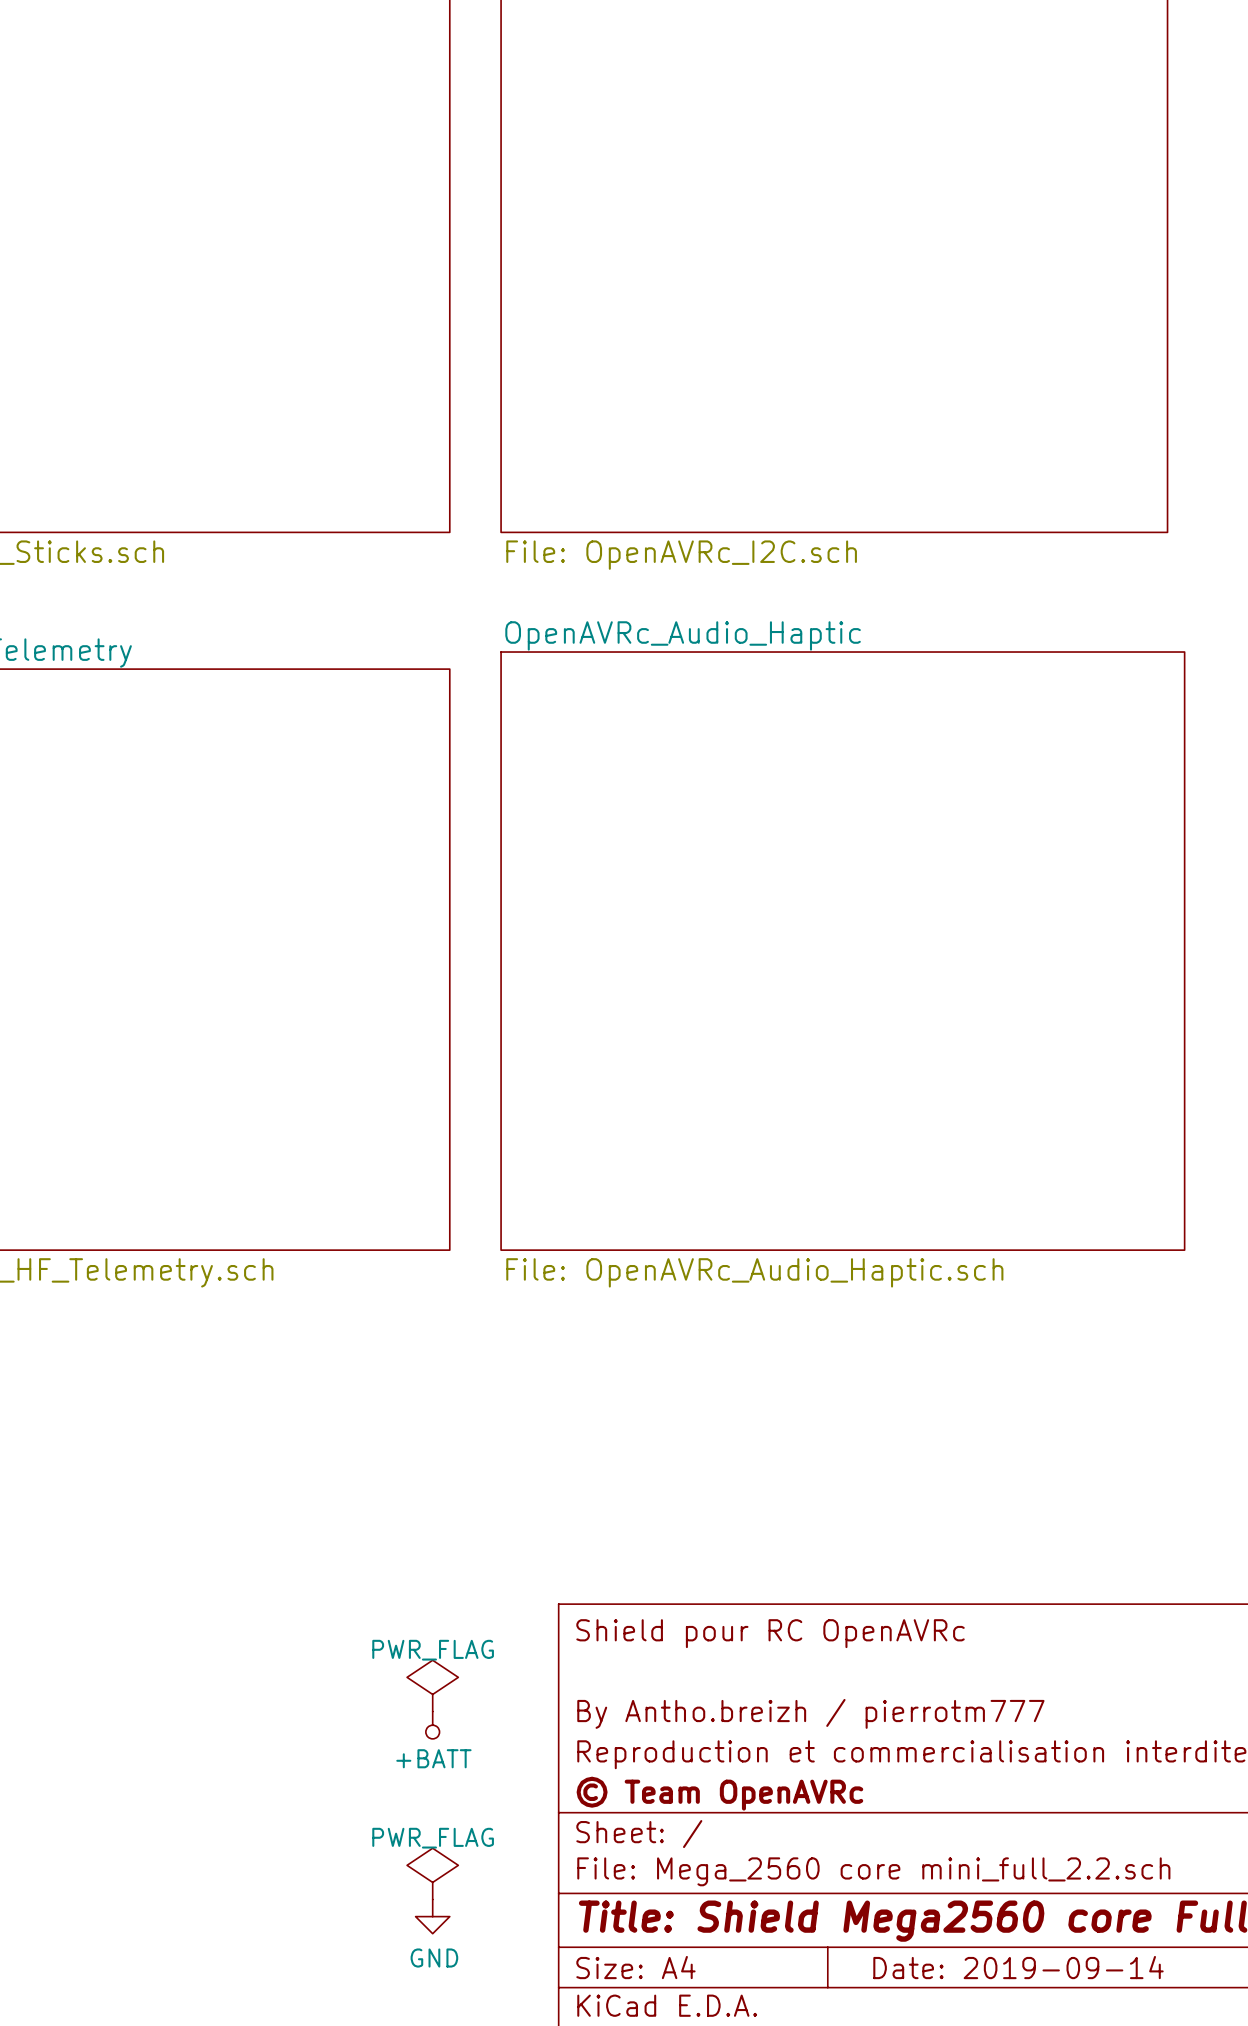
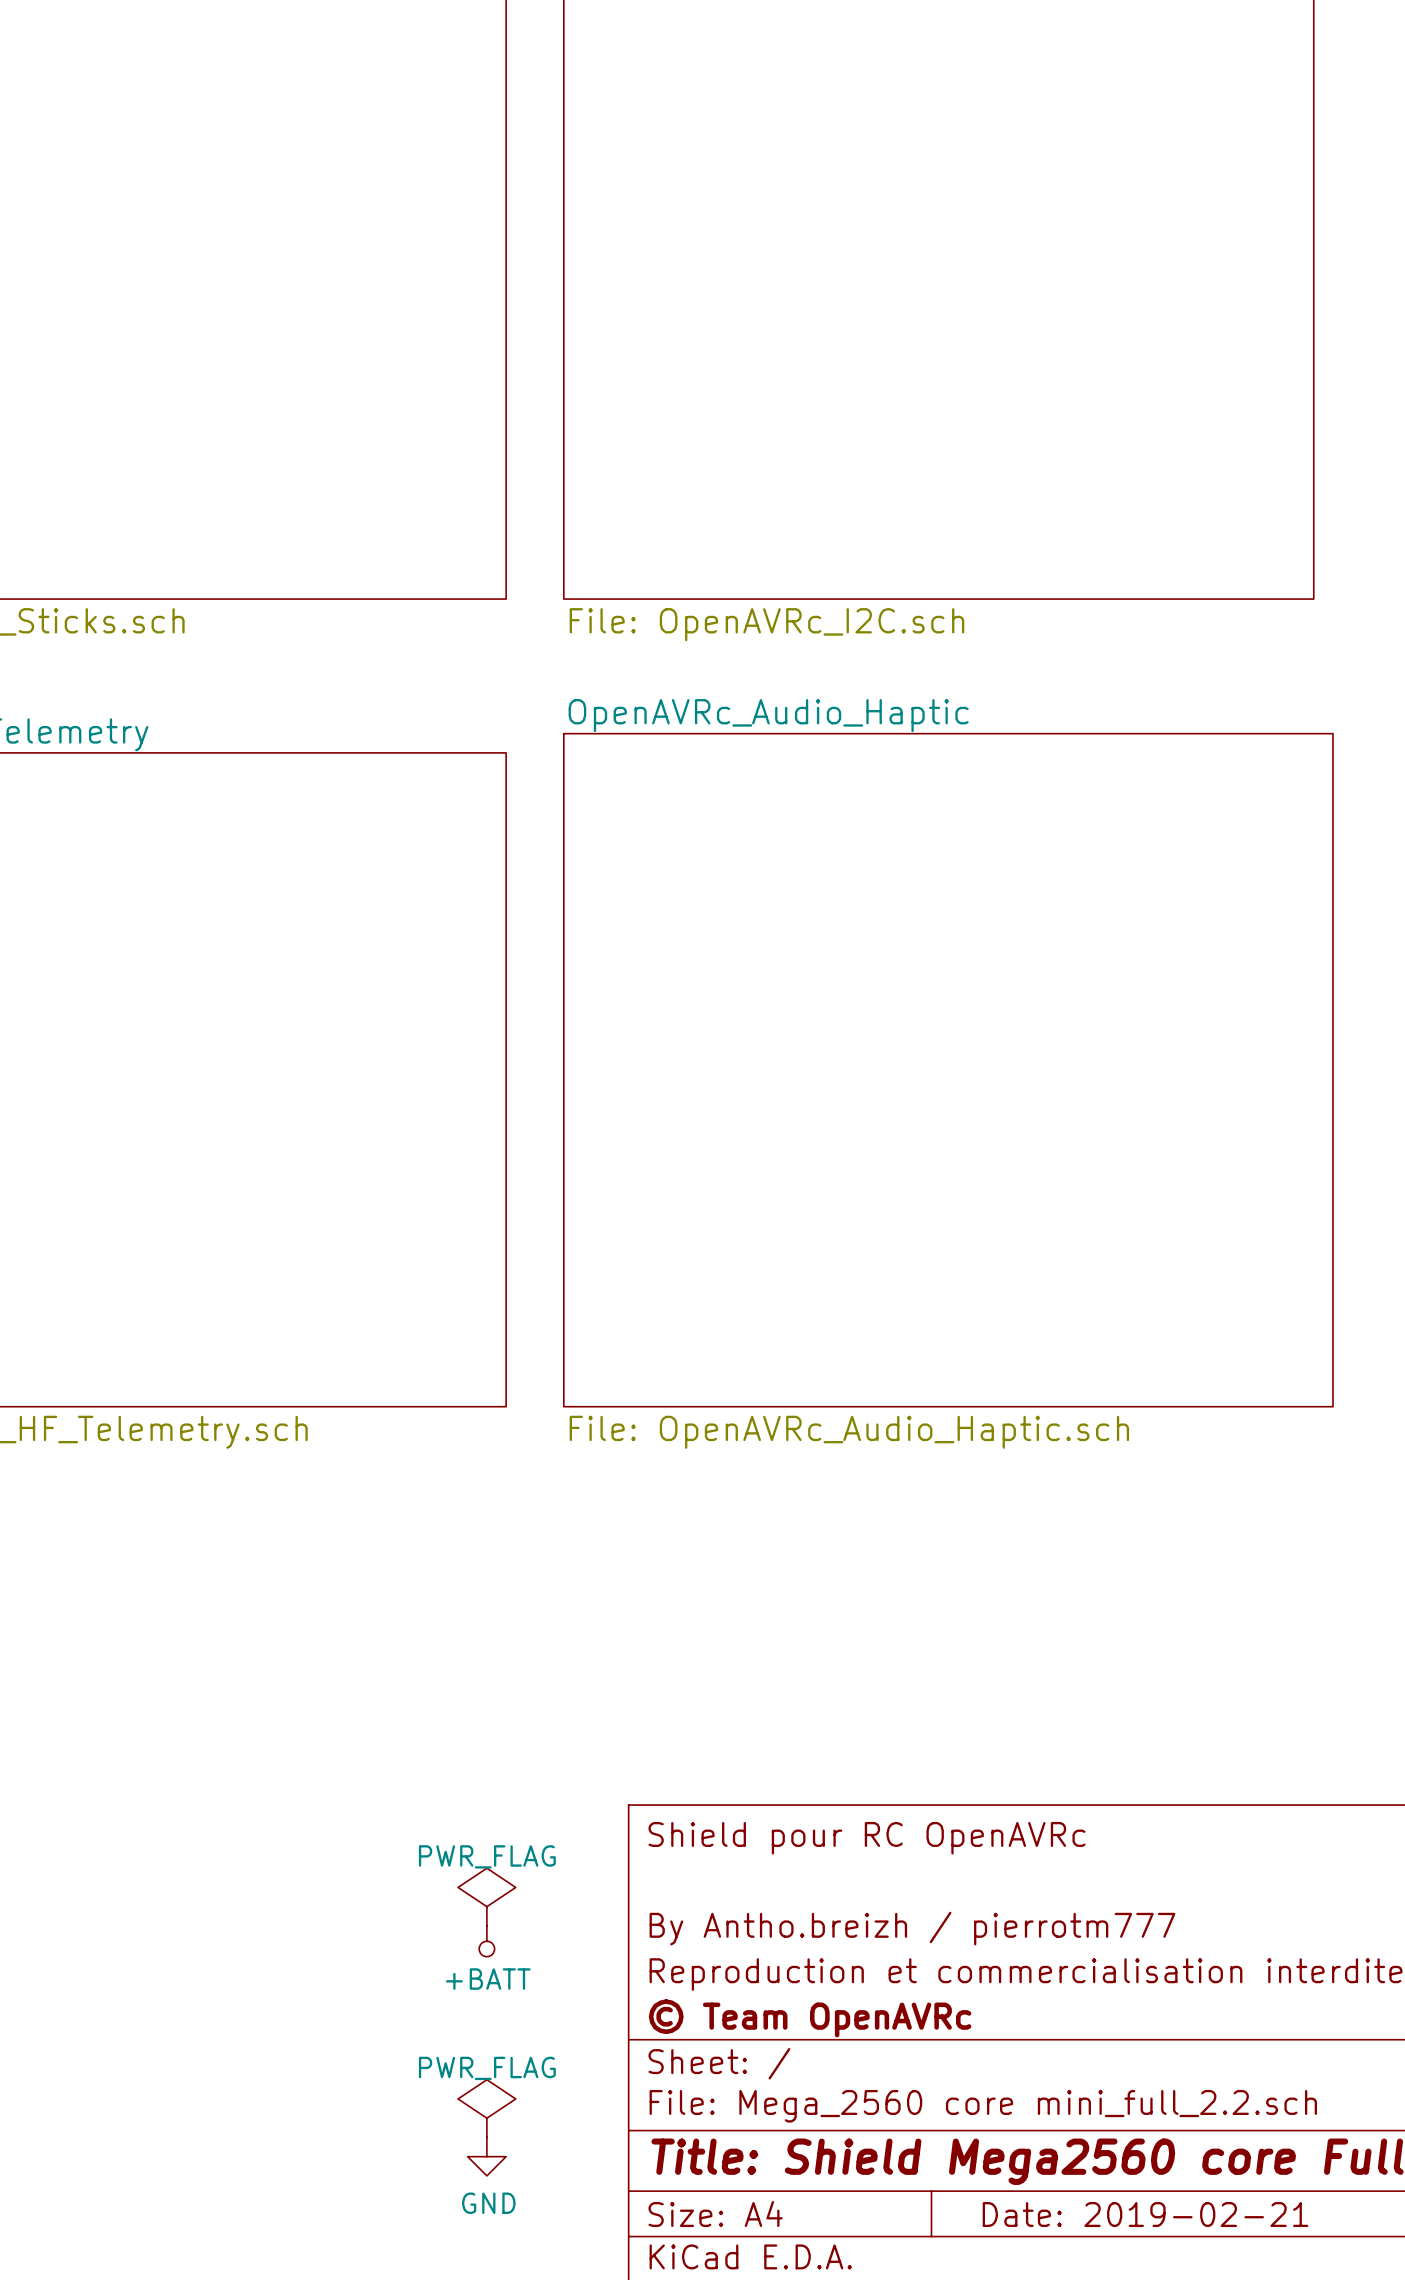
title block: Date: 2019-09-14 (1018, 1967) -> Date: 2019-02-21 (1145, 2214)

